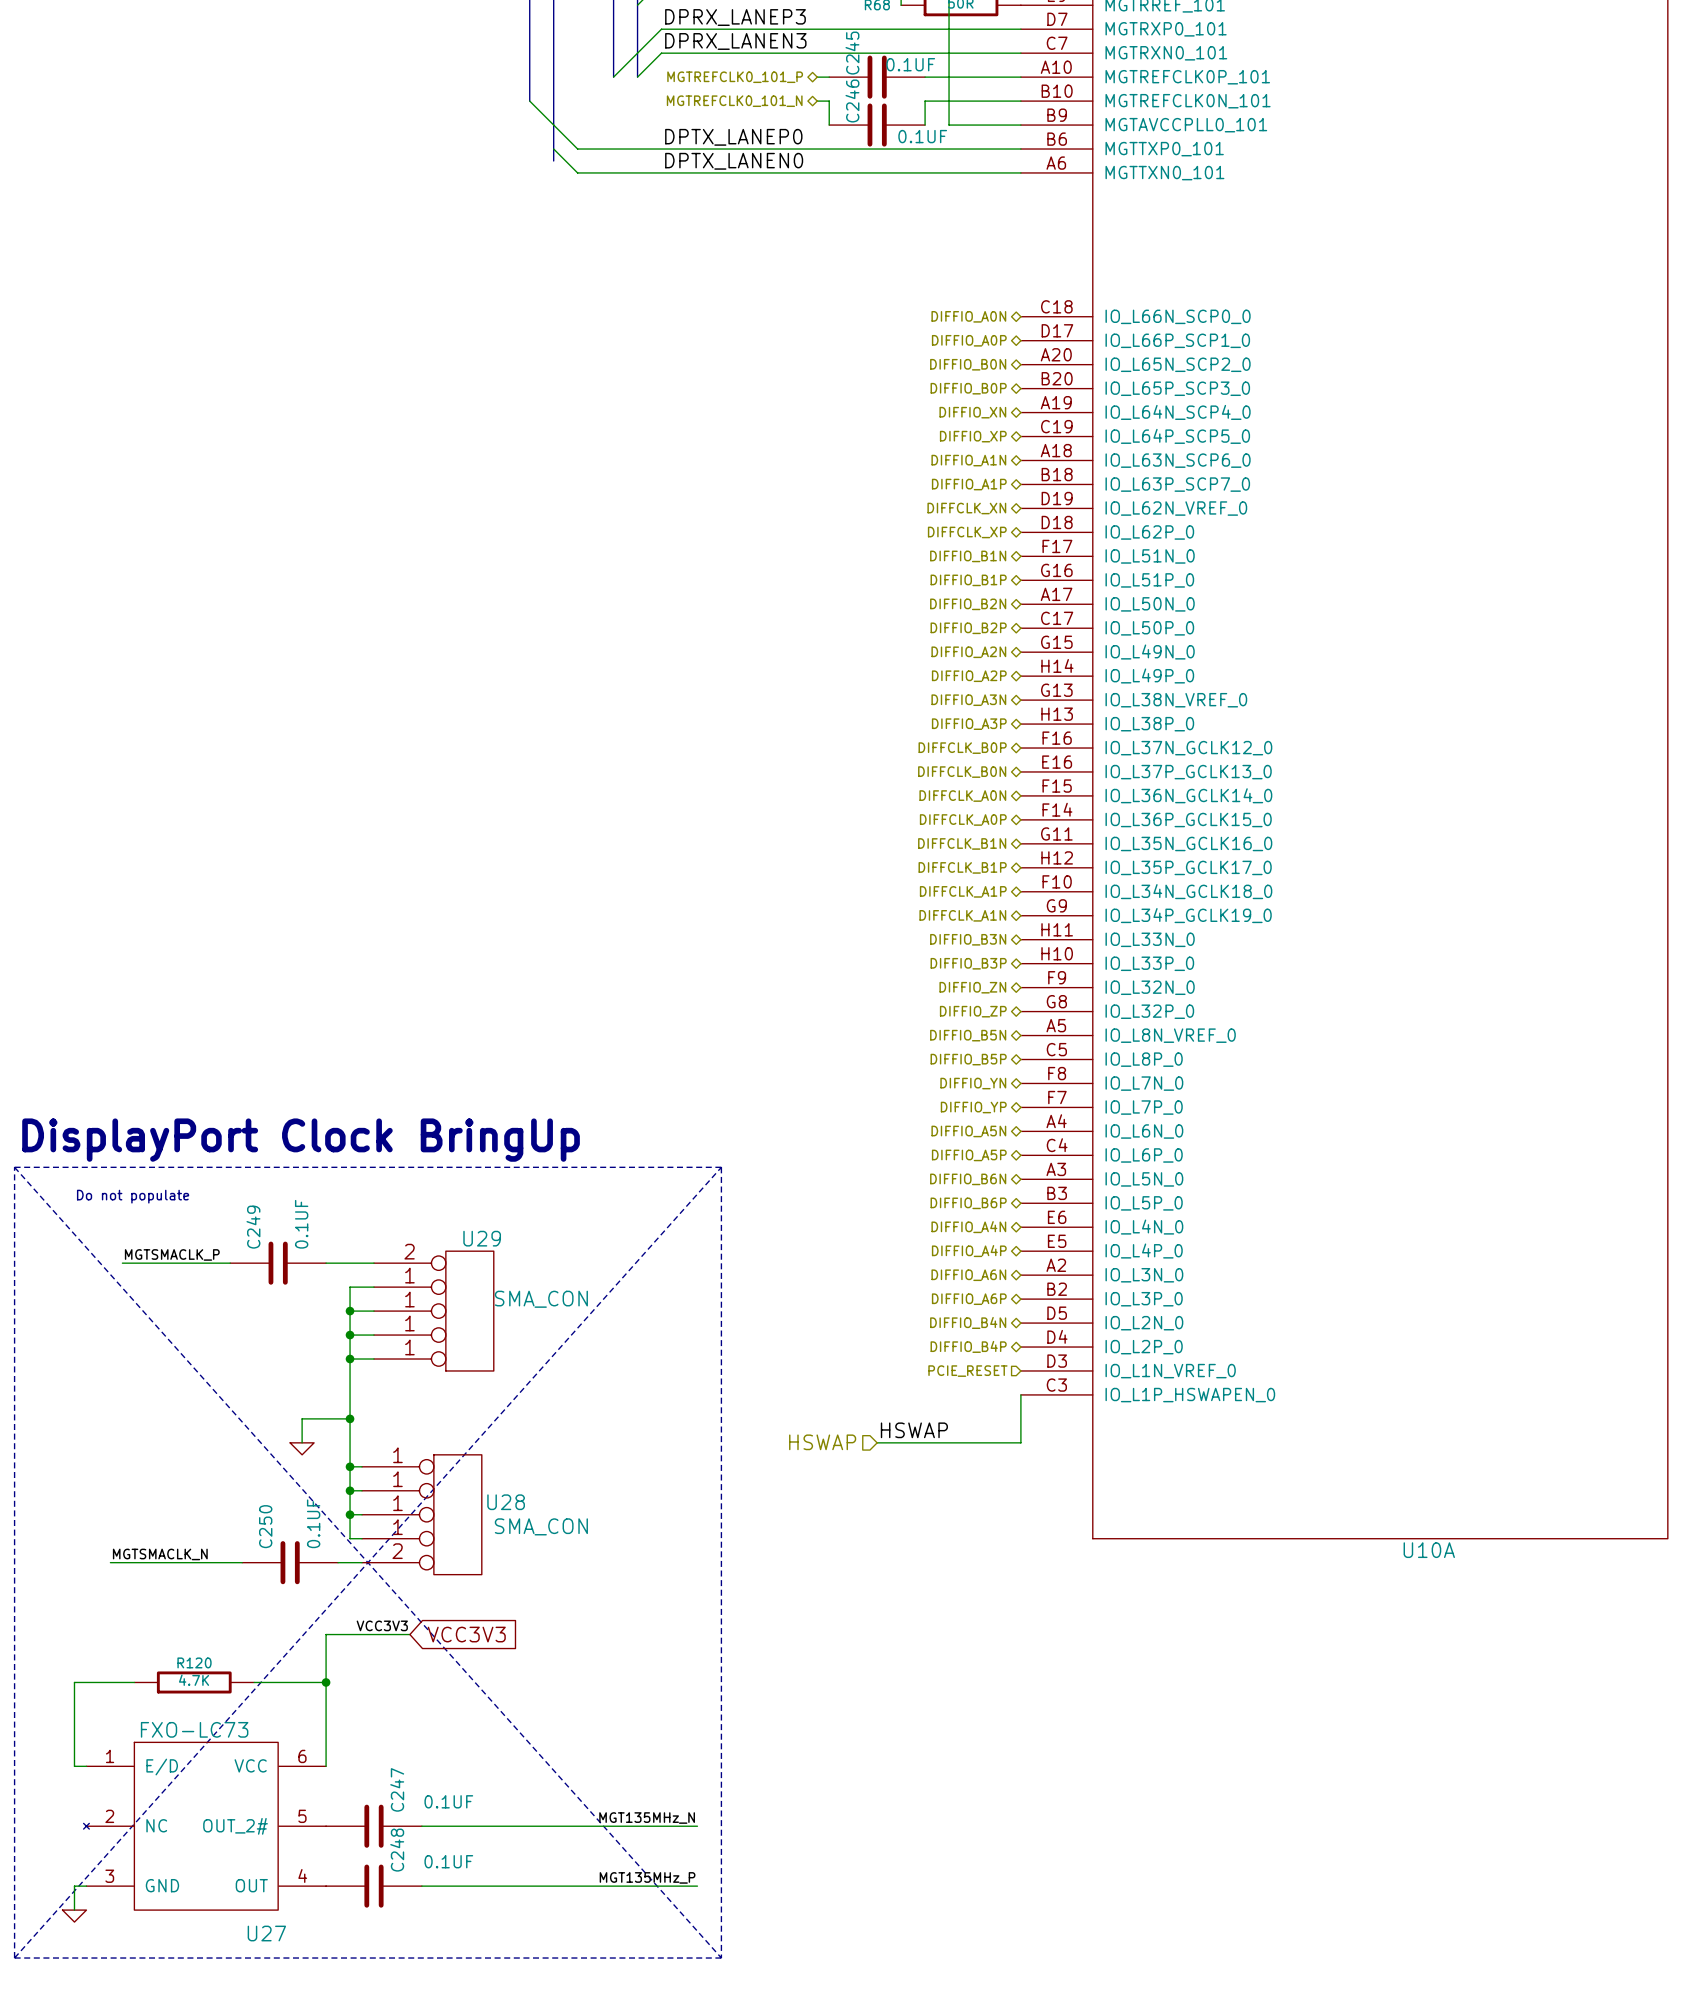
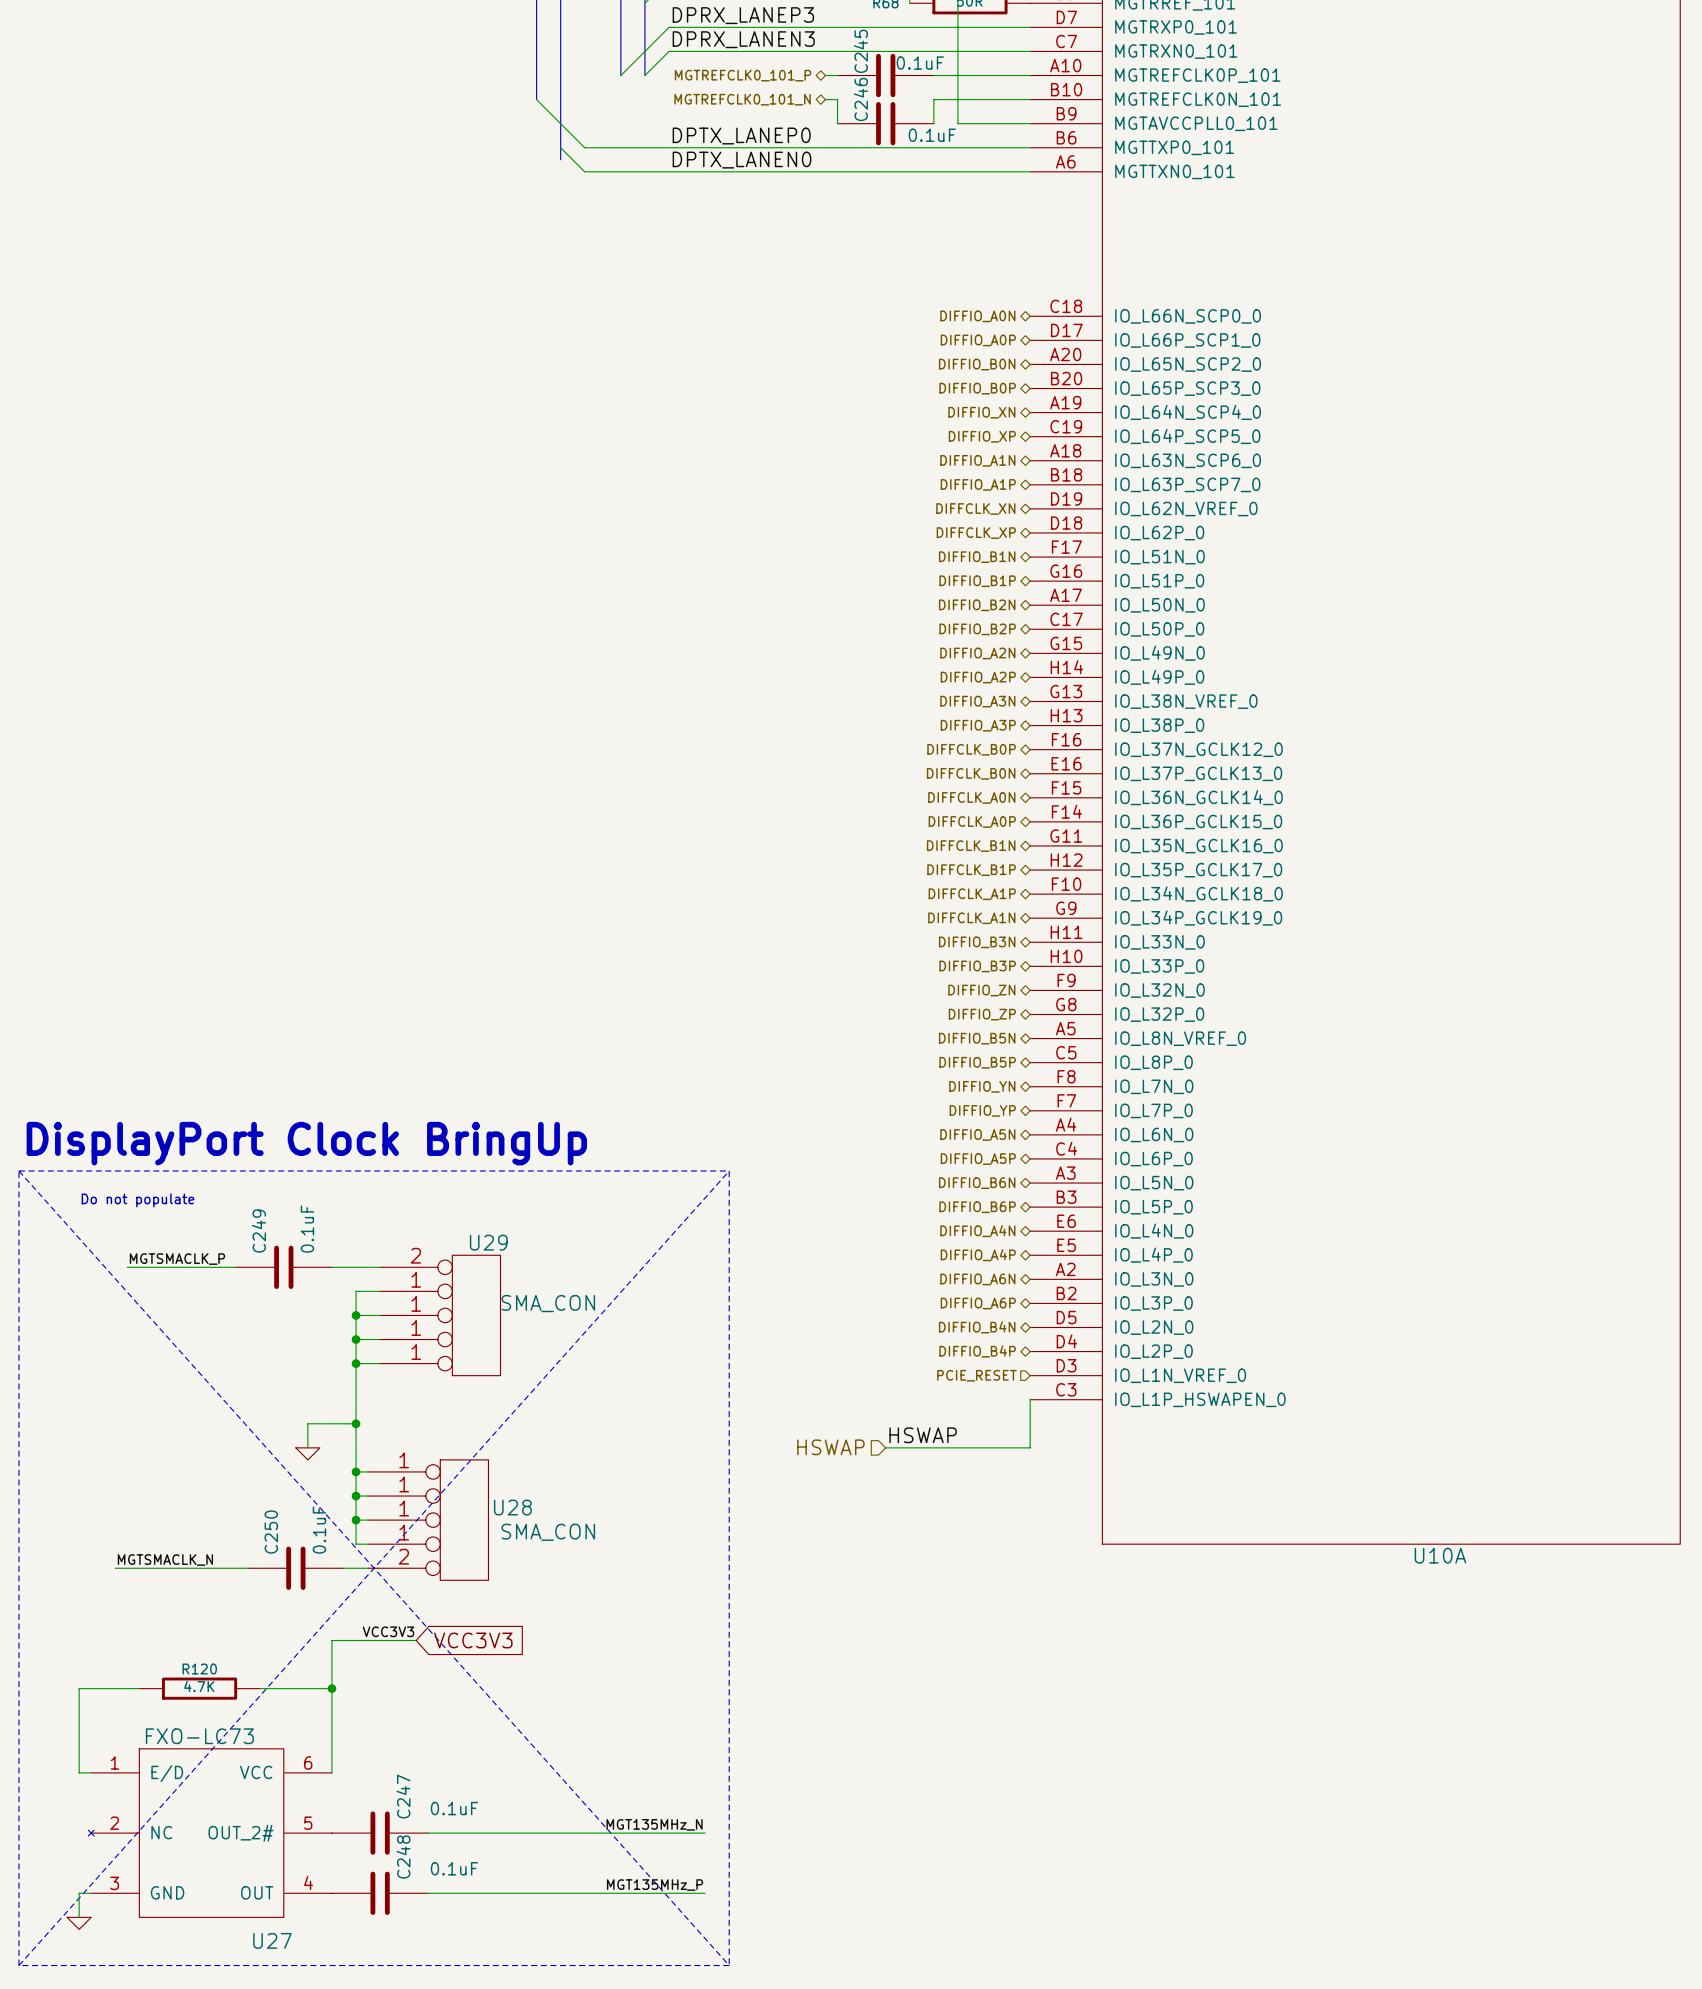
C245 value: 0.1UF (910, 64) -> 0.1uF (920, 63)
C246 value: 0.1UF (922, 136) -> 0.1uF (932, 135)
C249 value: 0.1UF (301, 1224) -> 0.1uF (307, 1229)
C250 value: 0.1UF (313, 1523) -> 0.1uF (319, 1530)
C247 value: 0.1UF (448, 1801) -> 0.1uF (454, 1808)
C248 value: 0.1UF (448, 1861) -> 0.1uF (454, 1868)

